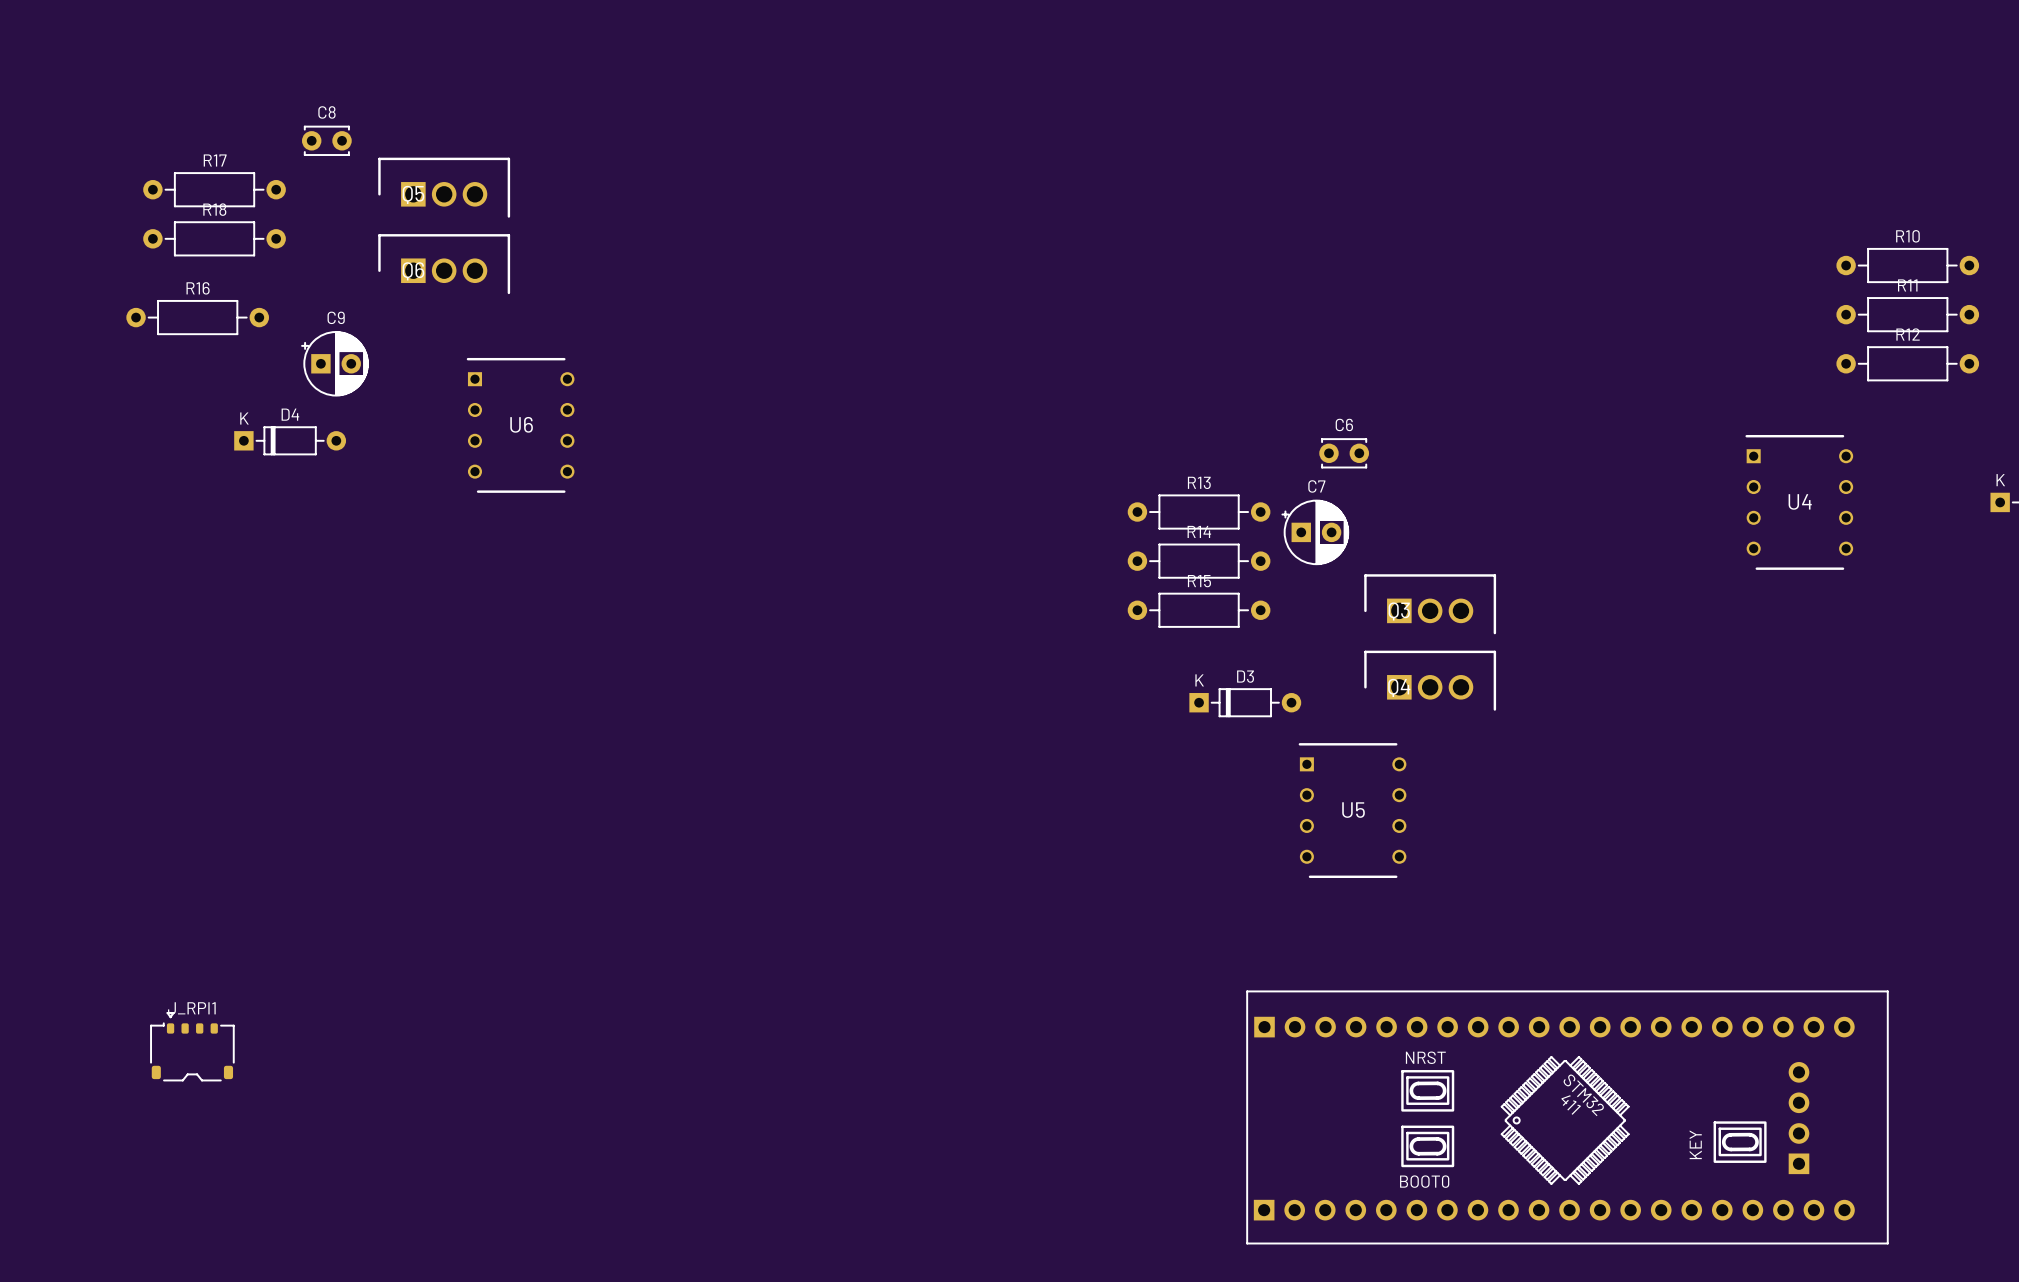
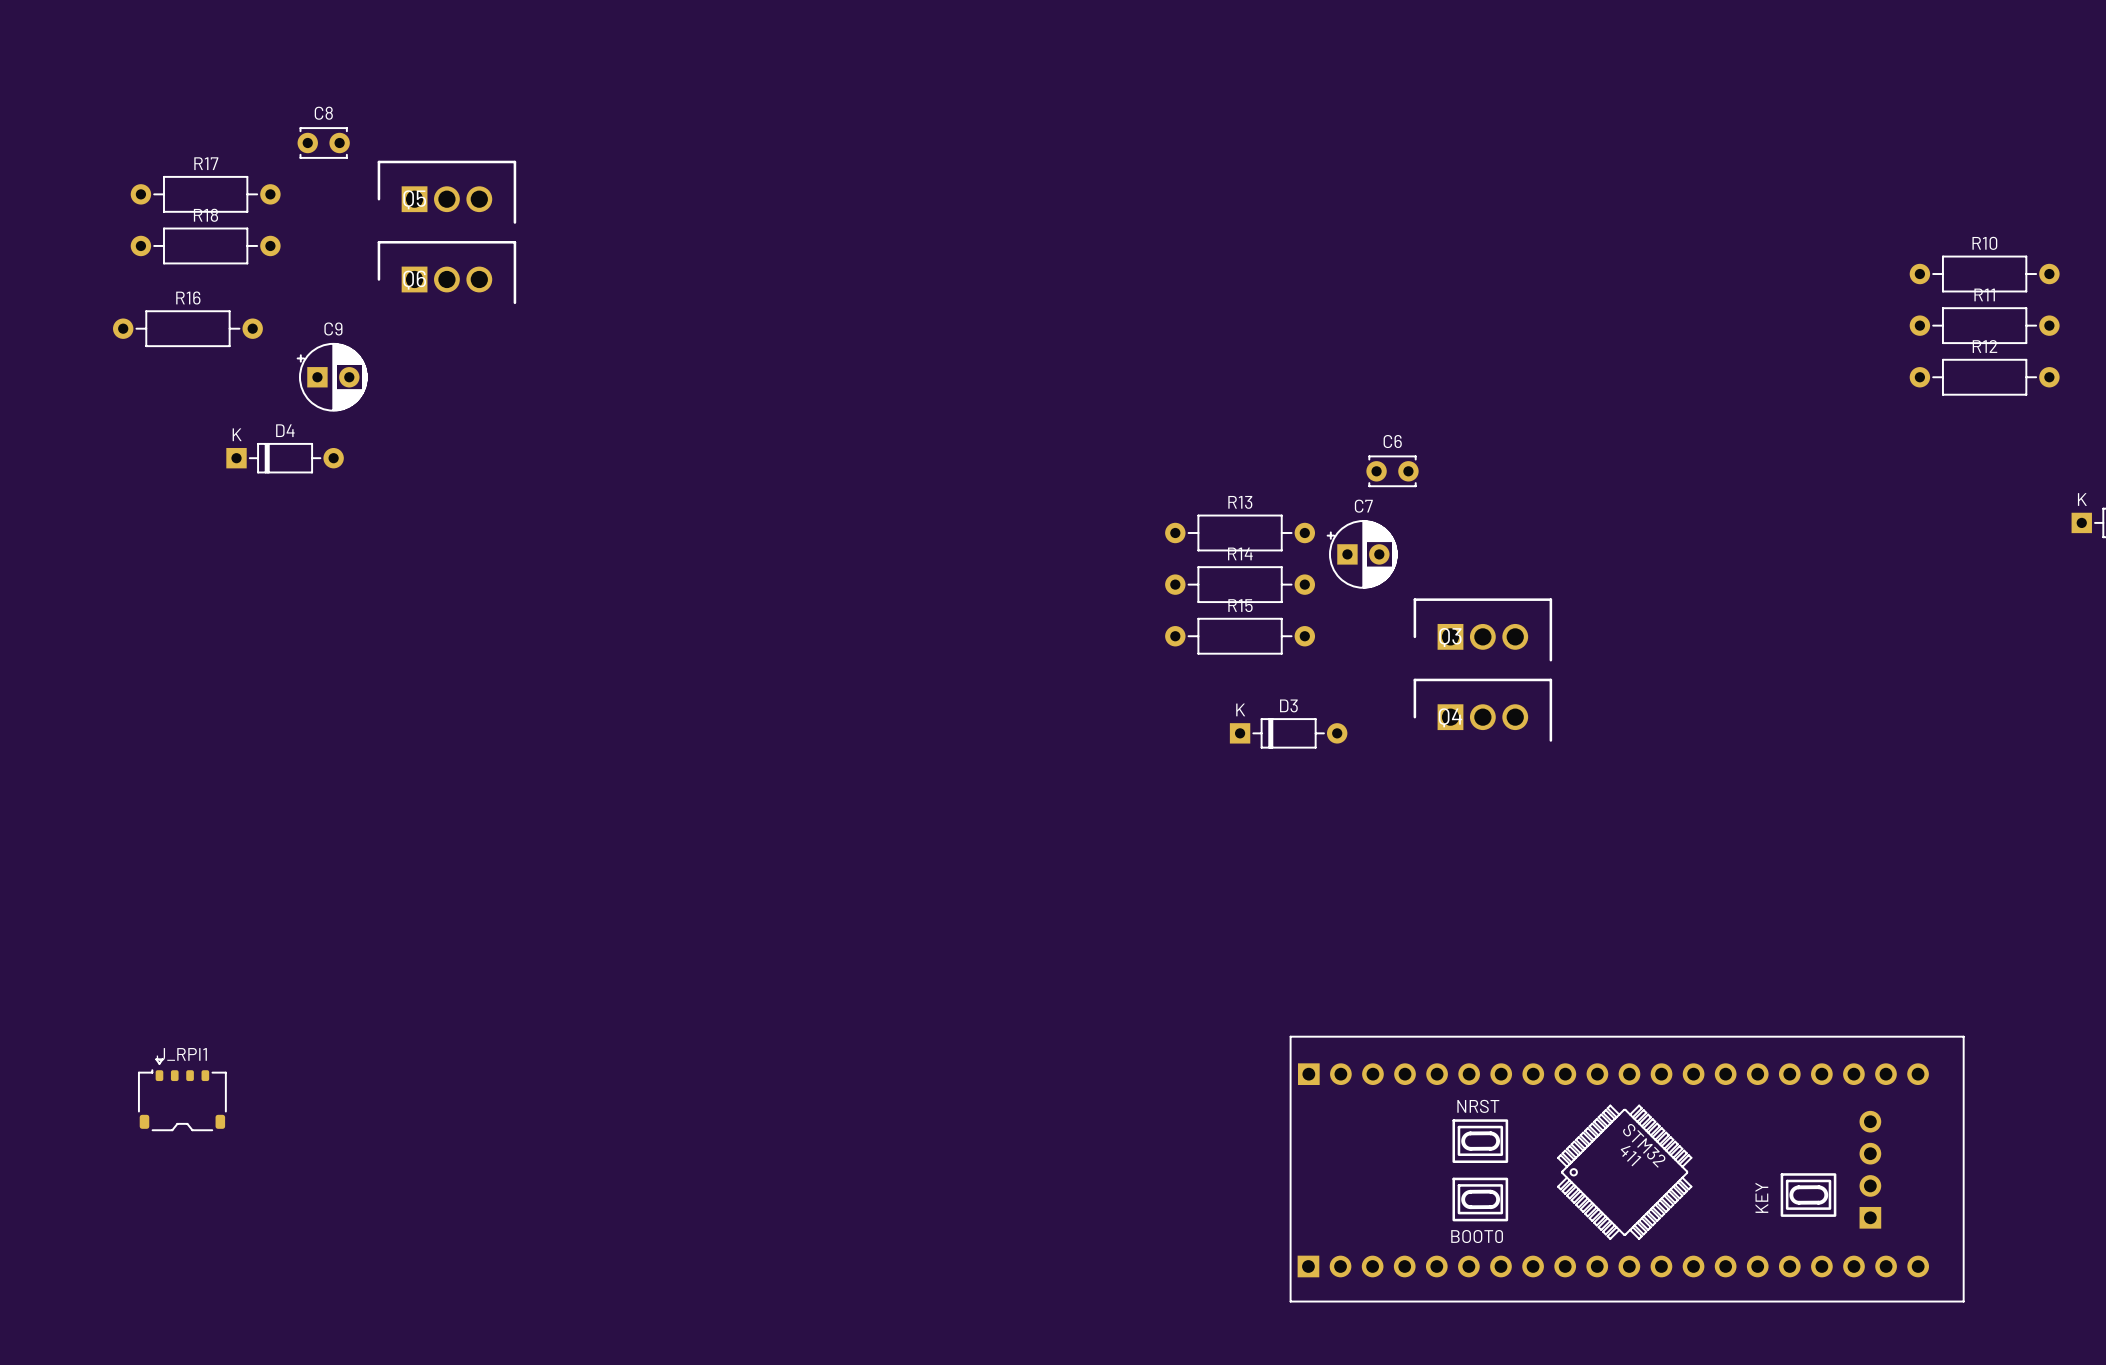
U6: (520, 425) -> none
U4: (1799, 502) -> none
U5: (1352, 810) -> none

